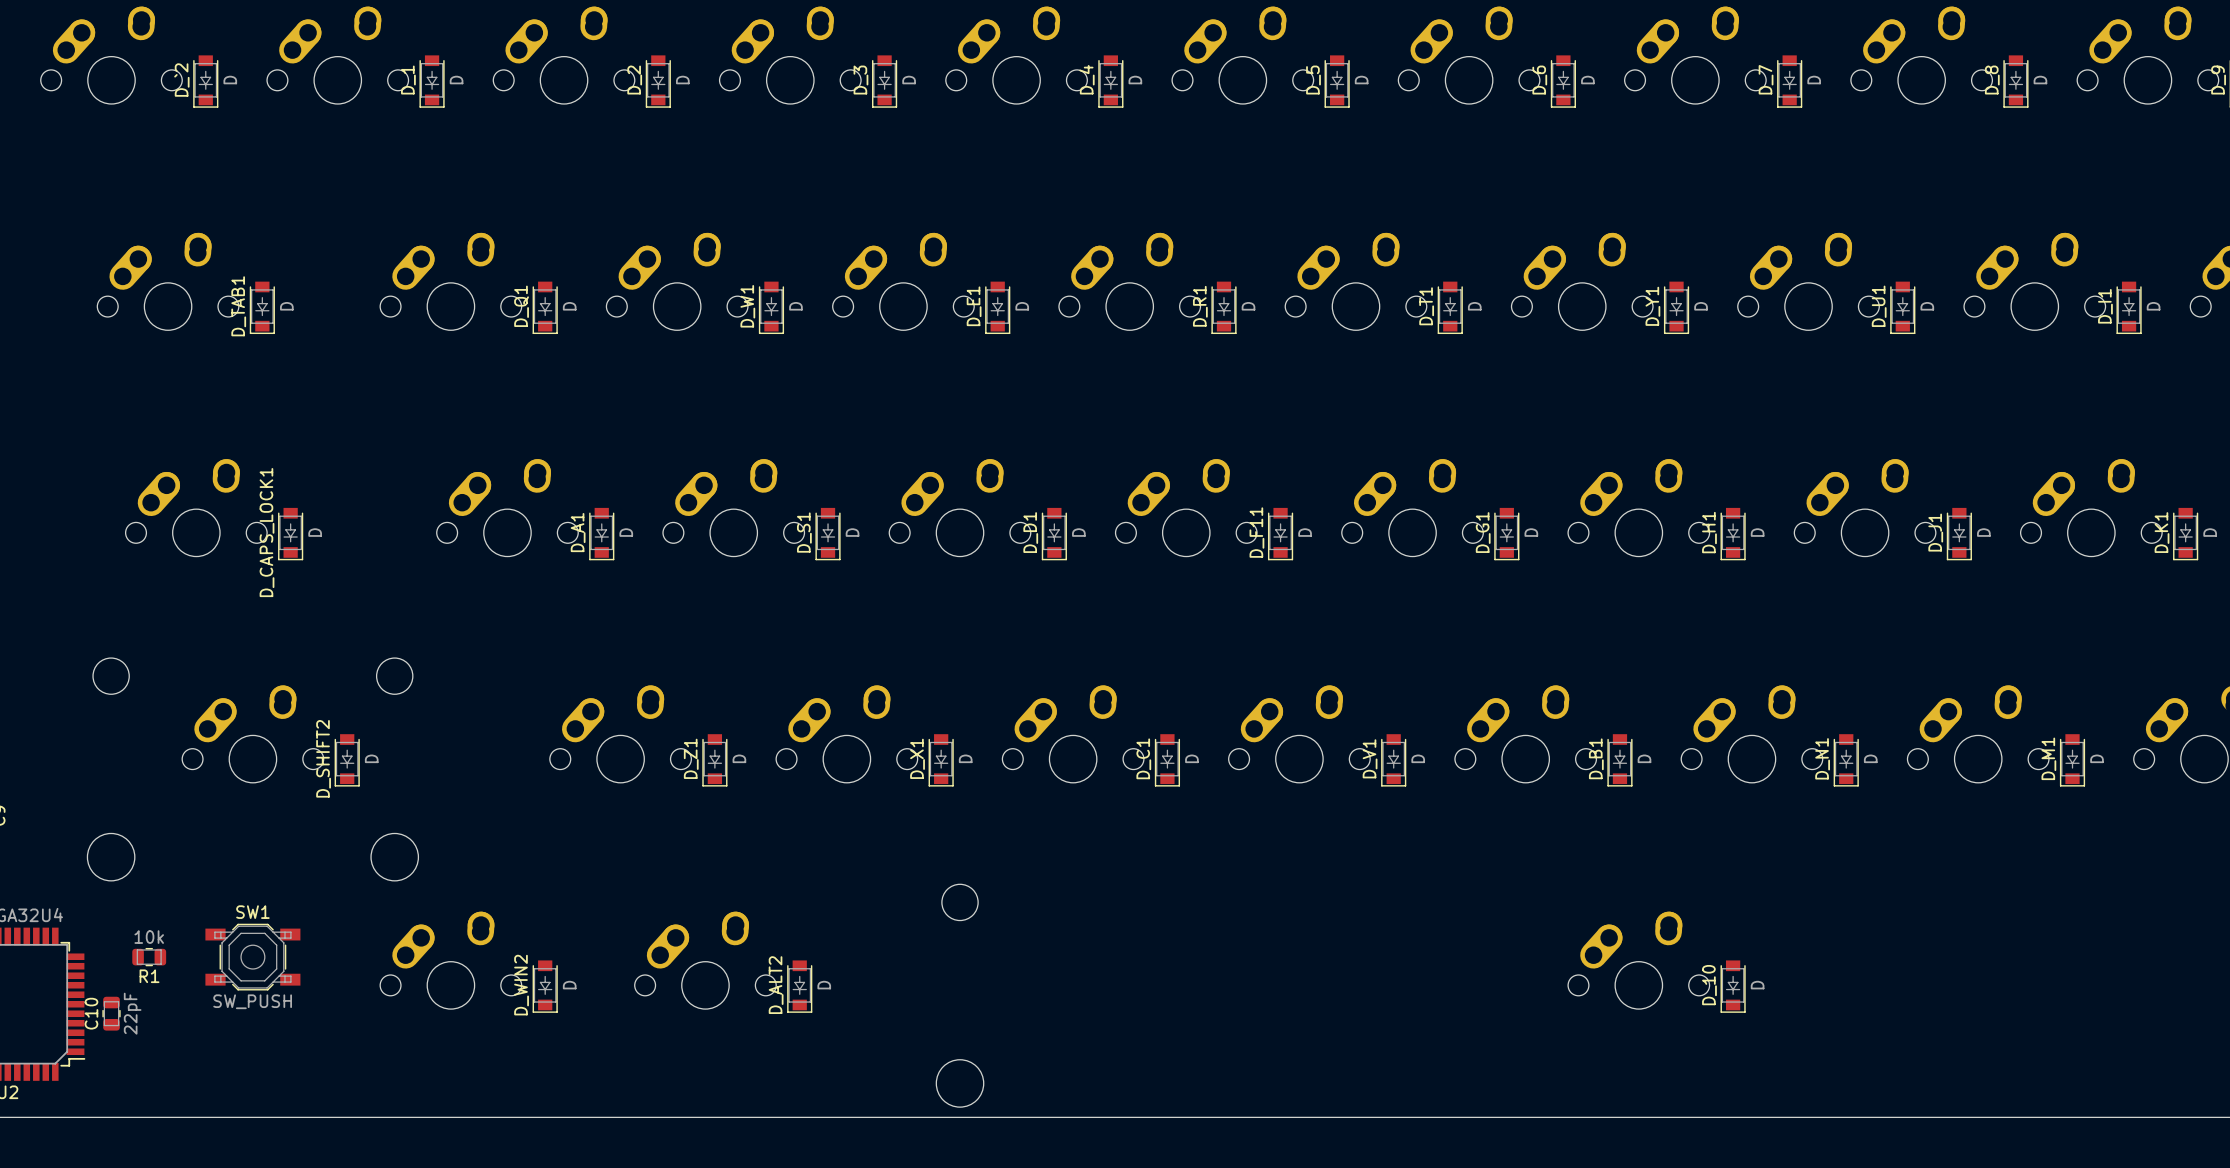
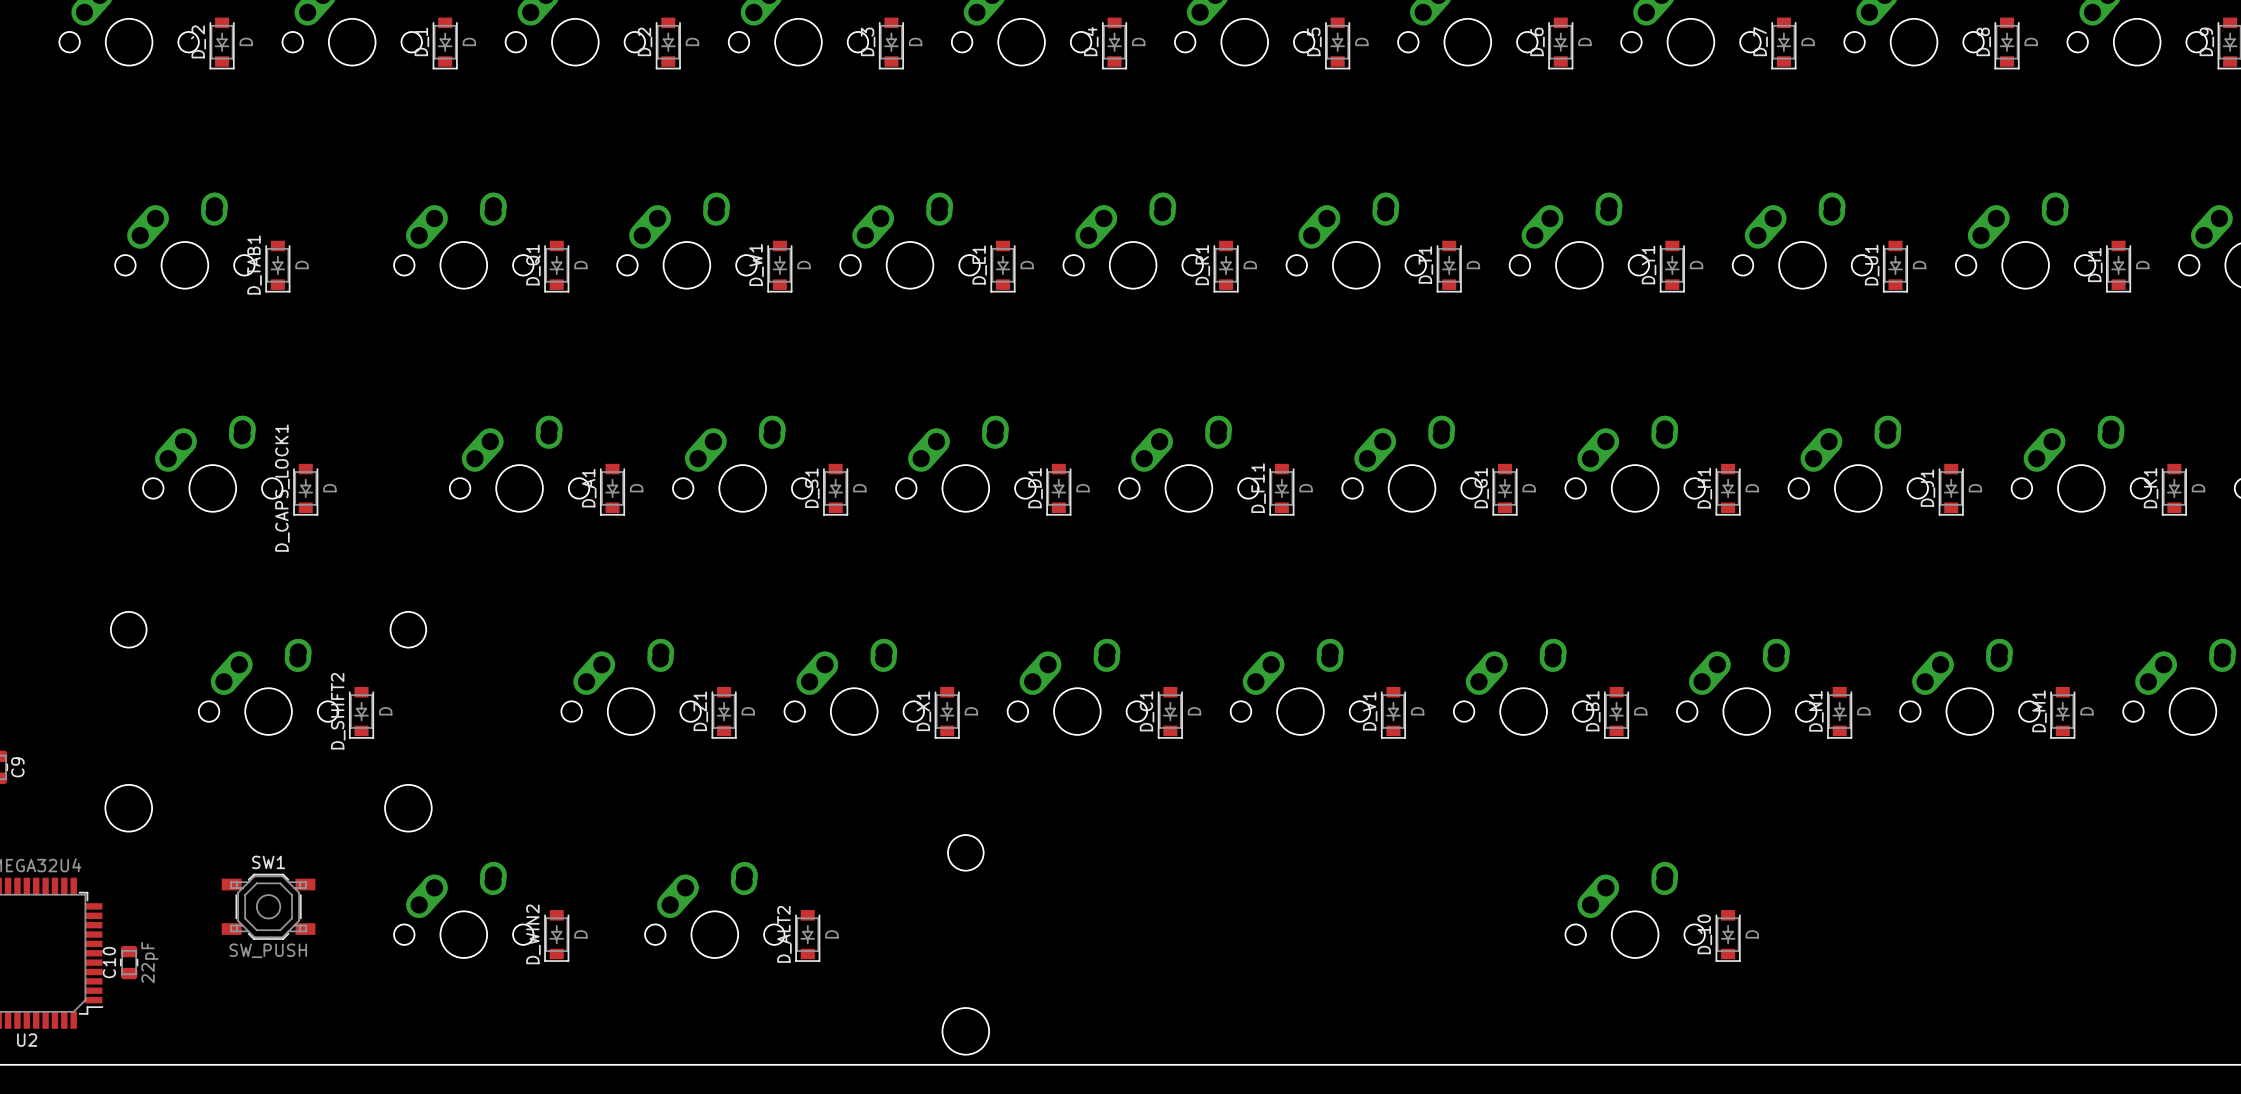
R1: 10k (149, 957) -> none

